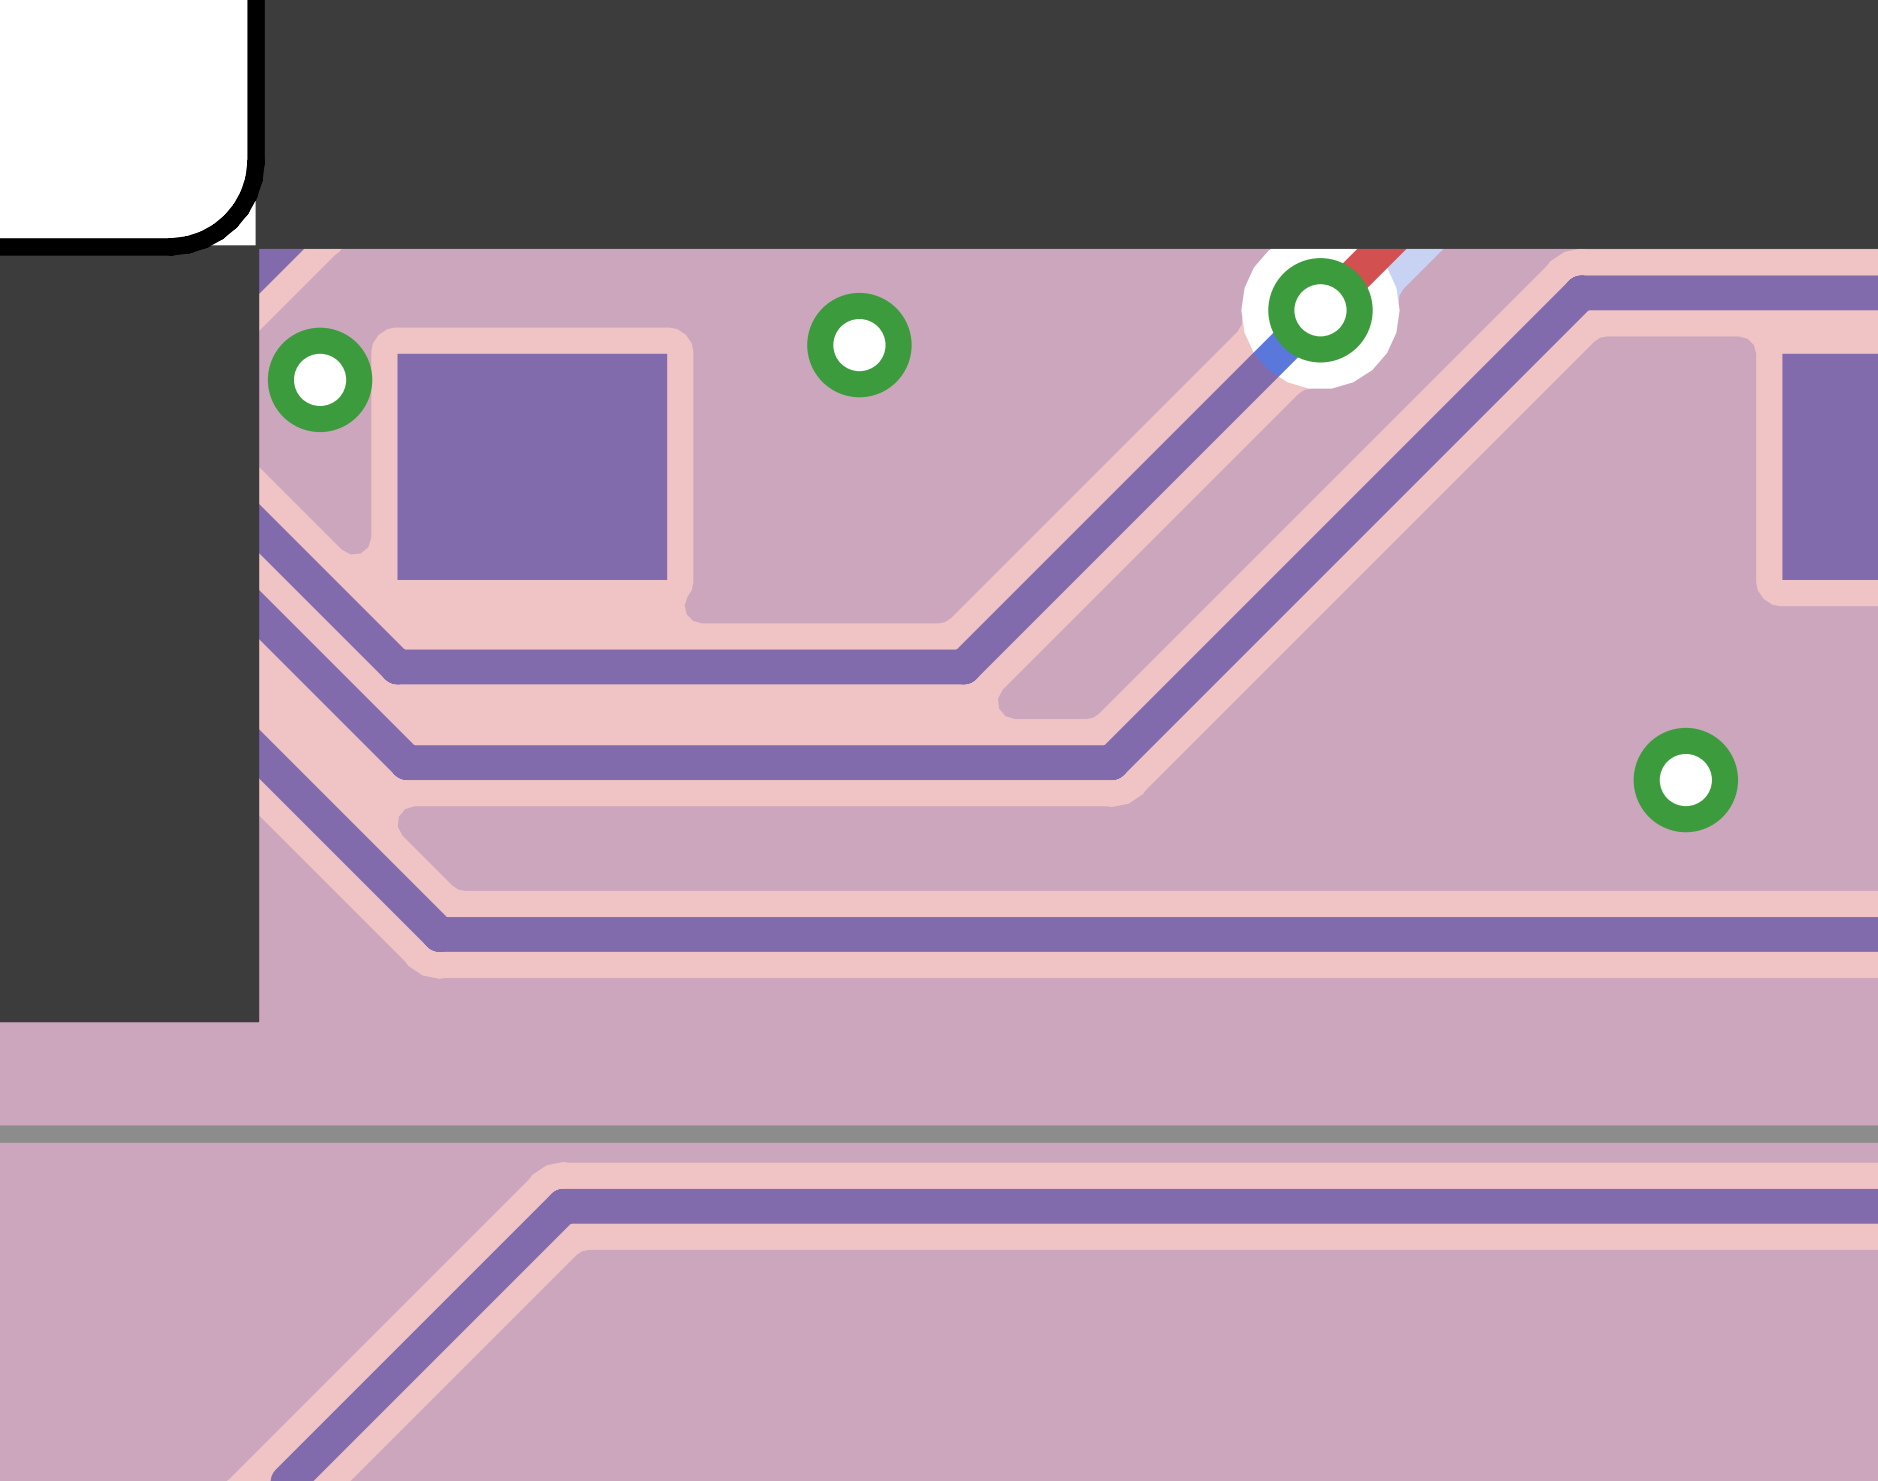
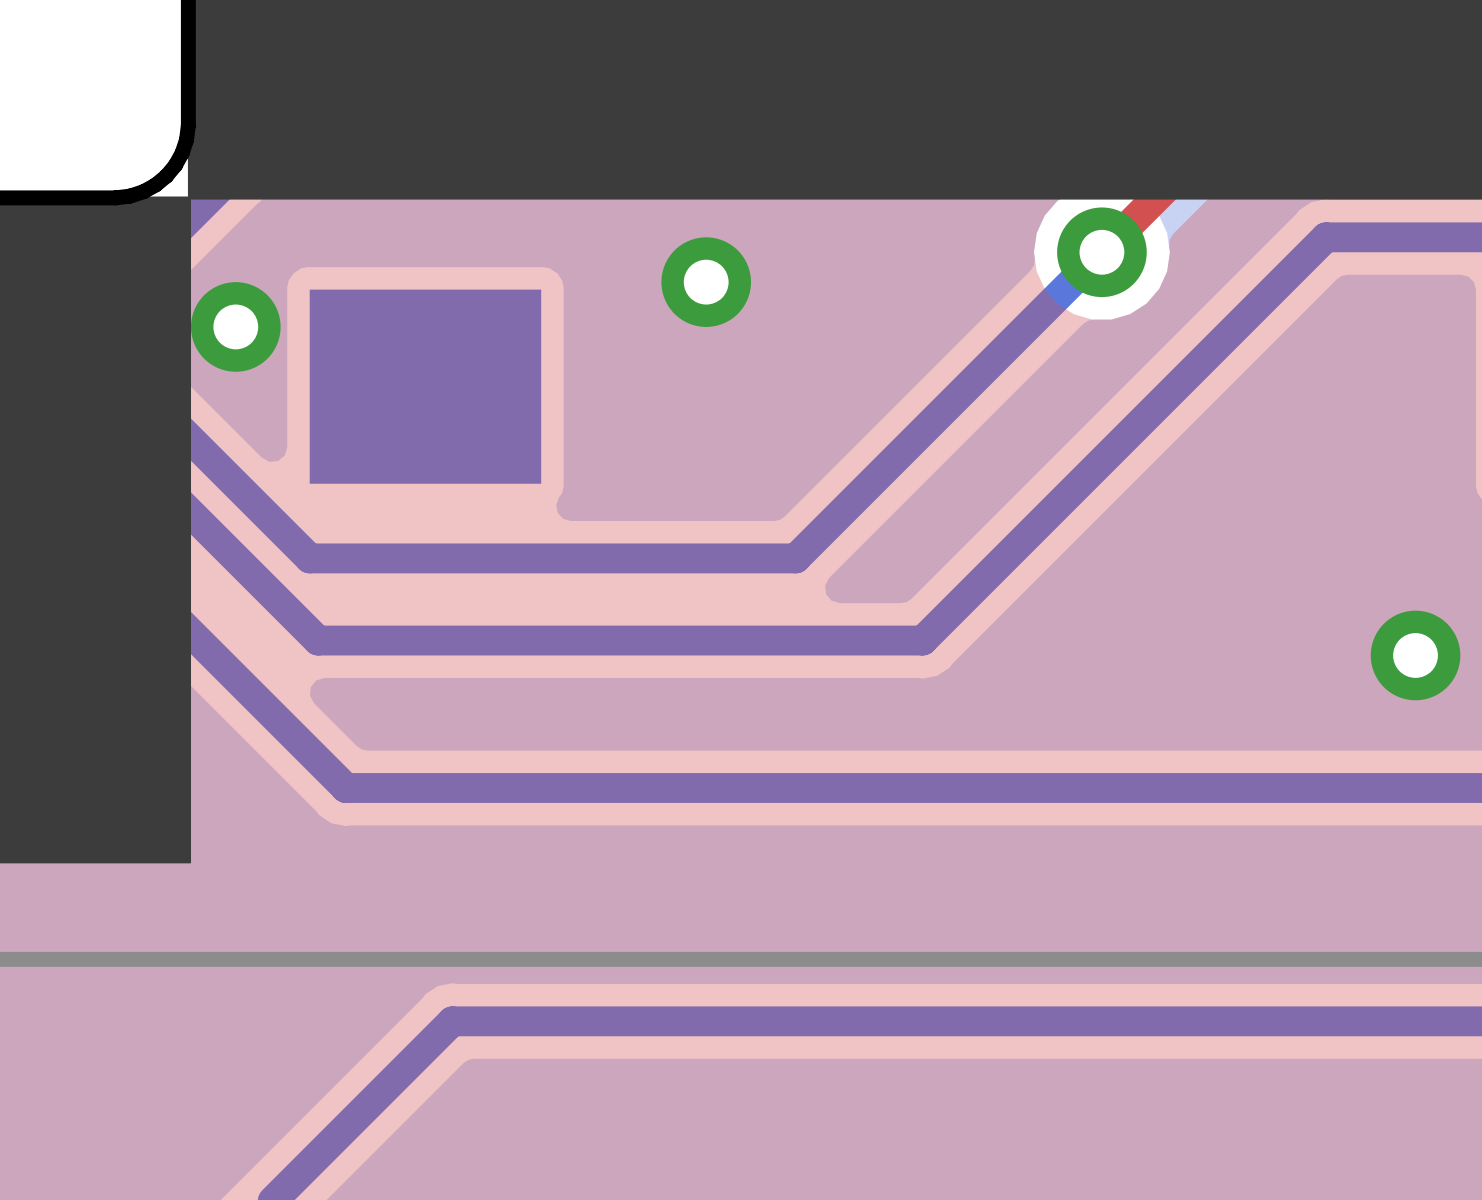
via position: (320, 379) -> (235, 326)

